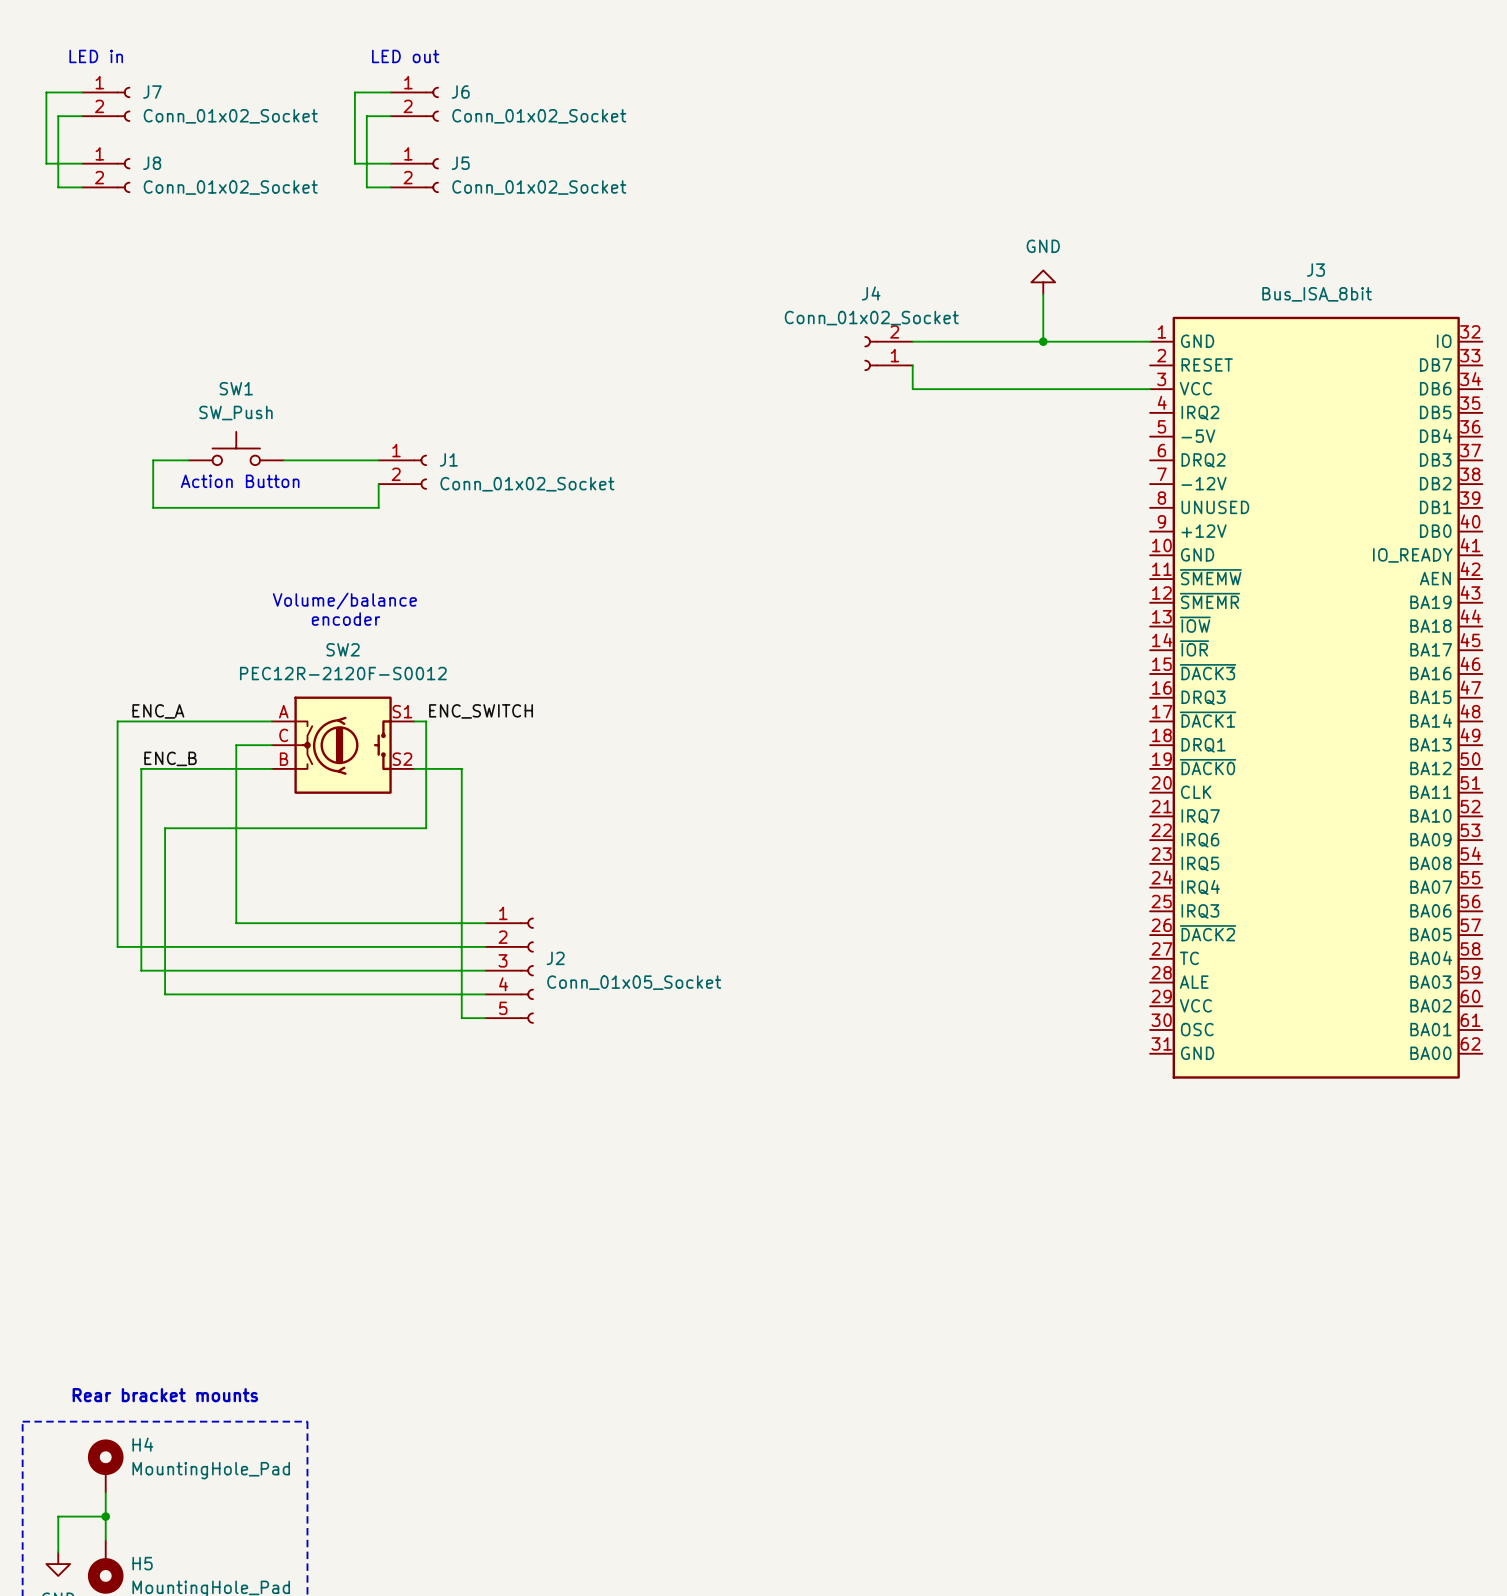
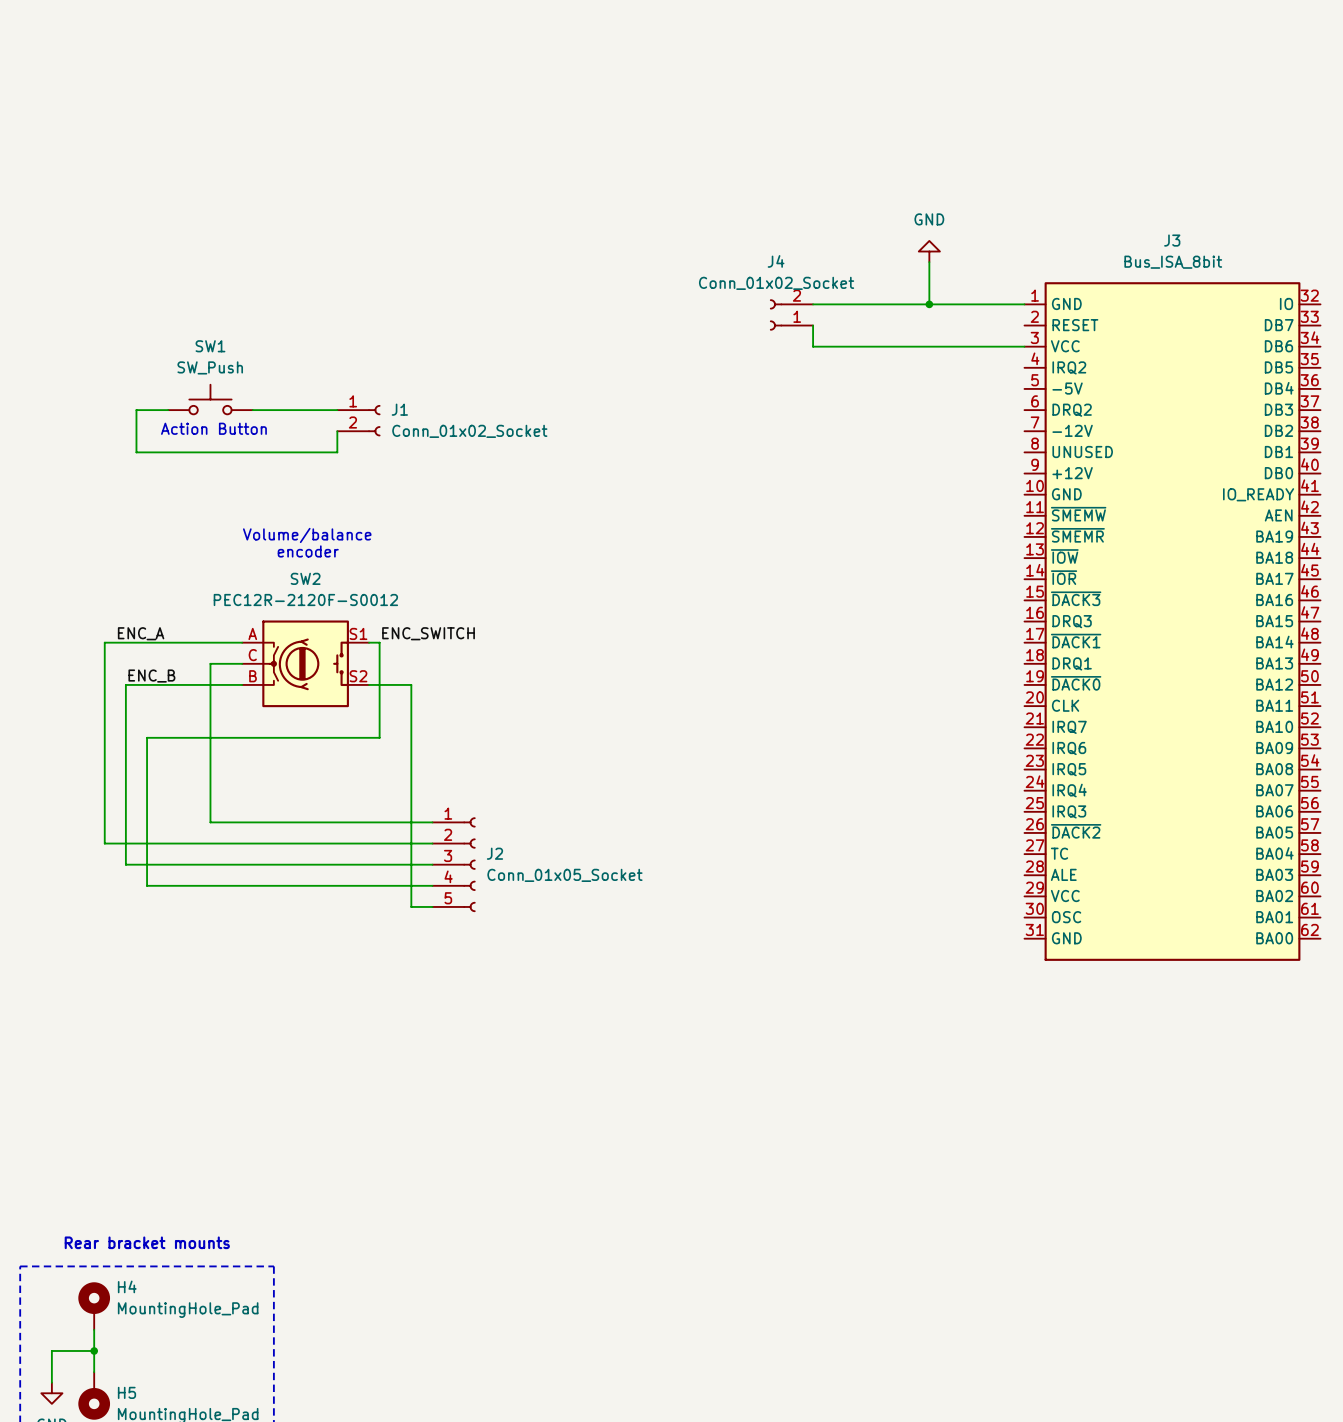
text: LED in (96, 56) -> none
text: LED out (405, 56) -> none
wire: (81, 92) (46, 92) (46, 163) (81, 163) -> none
wire: (390, 92) (354, 92) (354, 163) (390, 163) -> none
J7: Conn_01x02_Socket (106, 104) -> none
J6: Conn_01x02_Socket (414, 104) -> none
wire: (81, 116) (58, 116) (58, 187) (81, 187) -> none
wire: (390, 116) (366, 116) (366, 187) (390, 187) -> none
J8: Conn_01x02_Socket (106, 175) -> none
J5: Conn_01x02_Socket (414, 175) -> none

